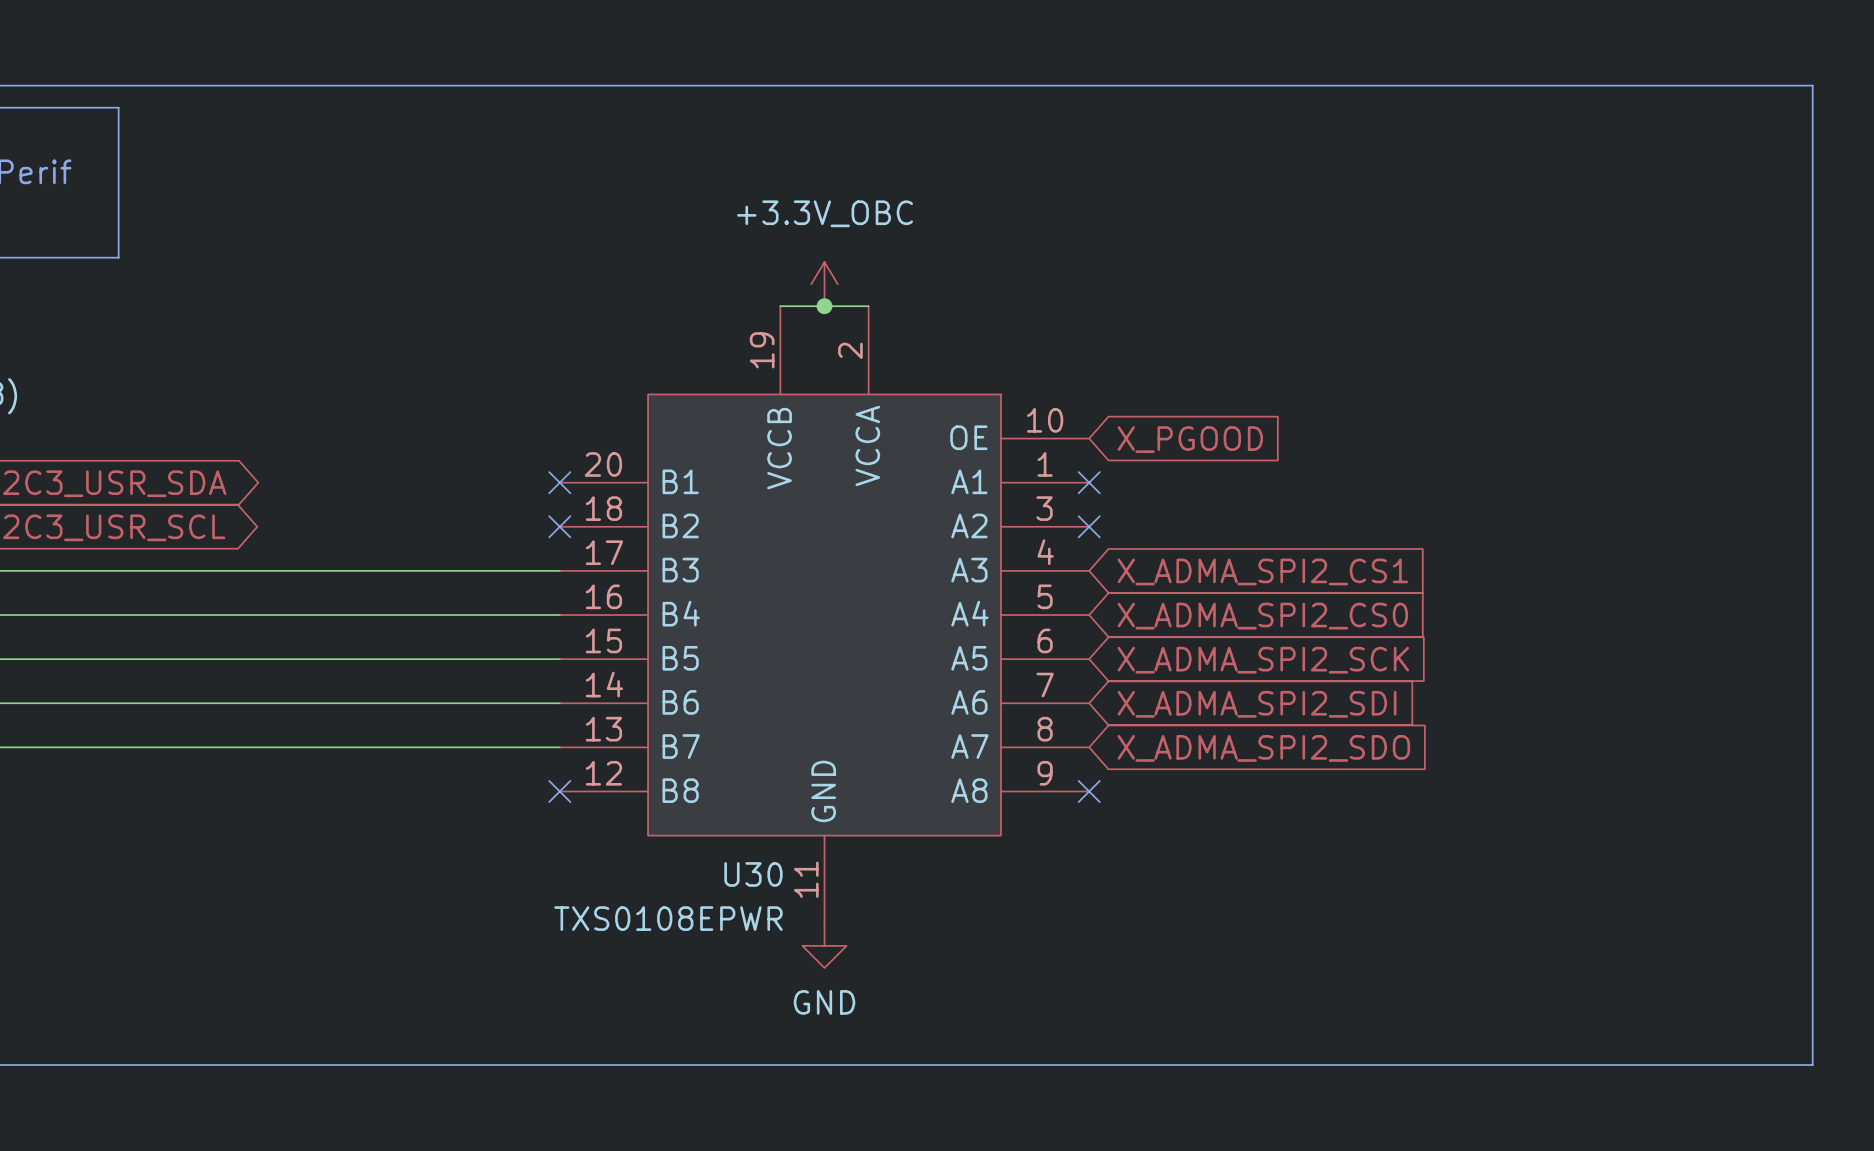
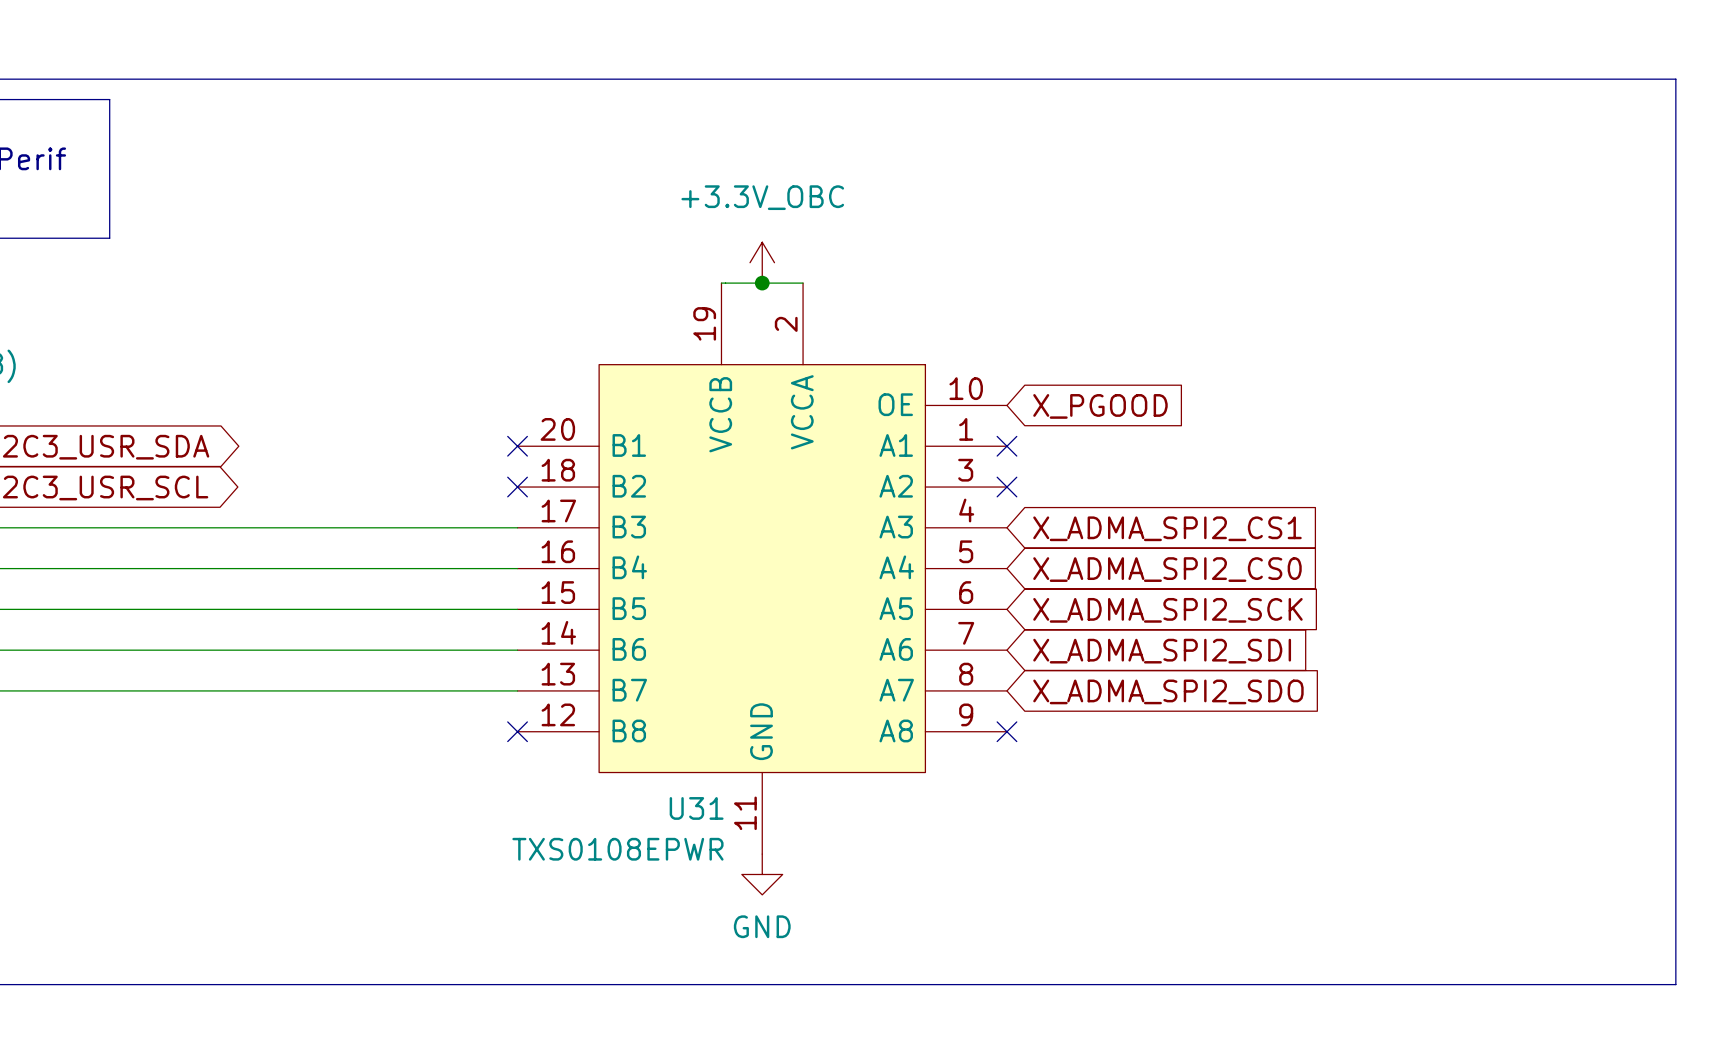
U30 name: U30 (753, 874) -> U31 (696, 808)

